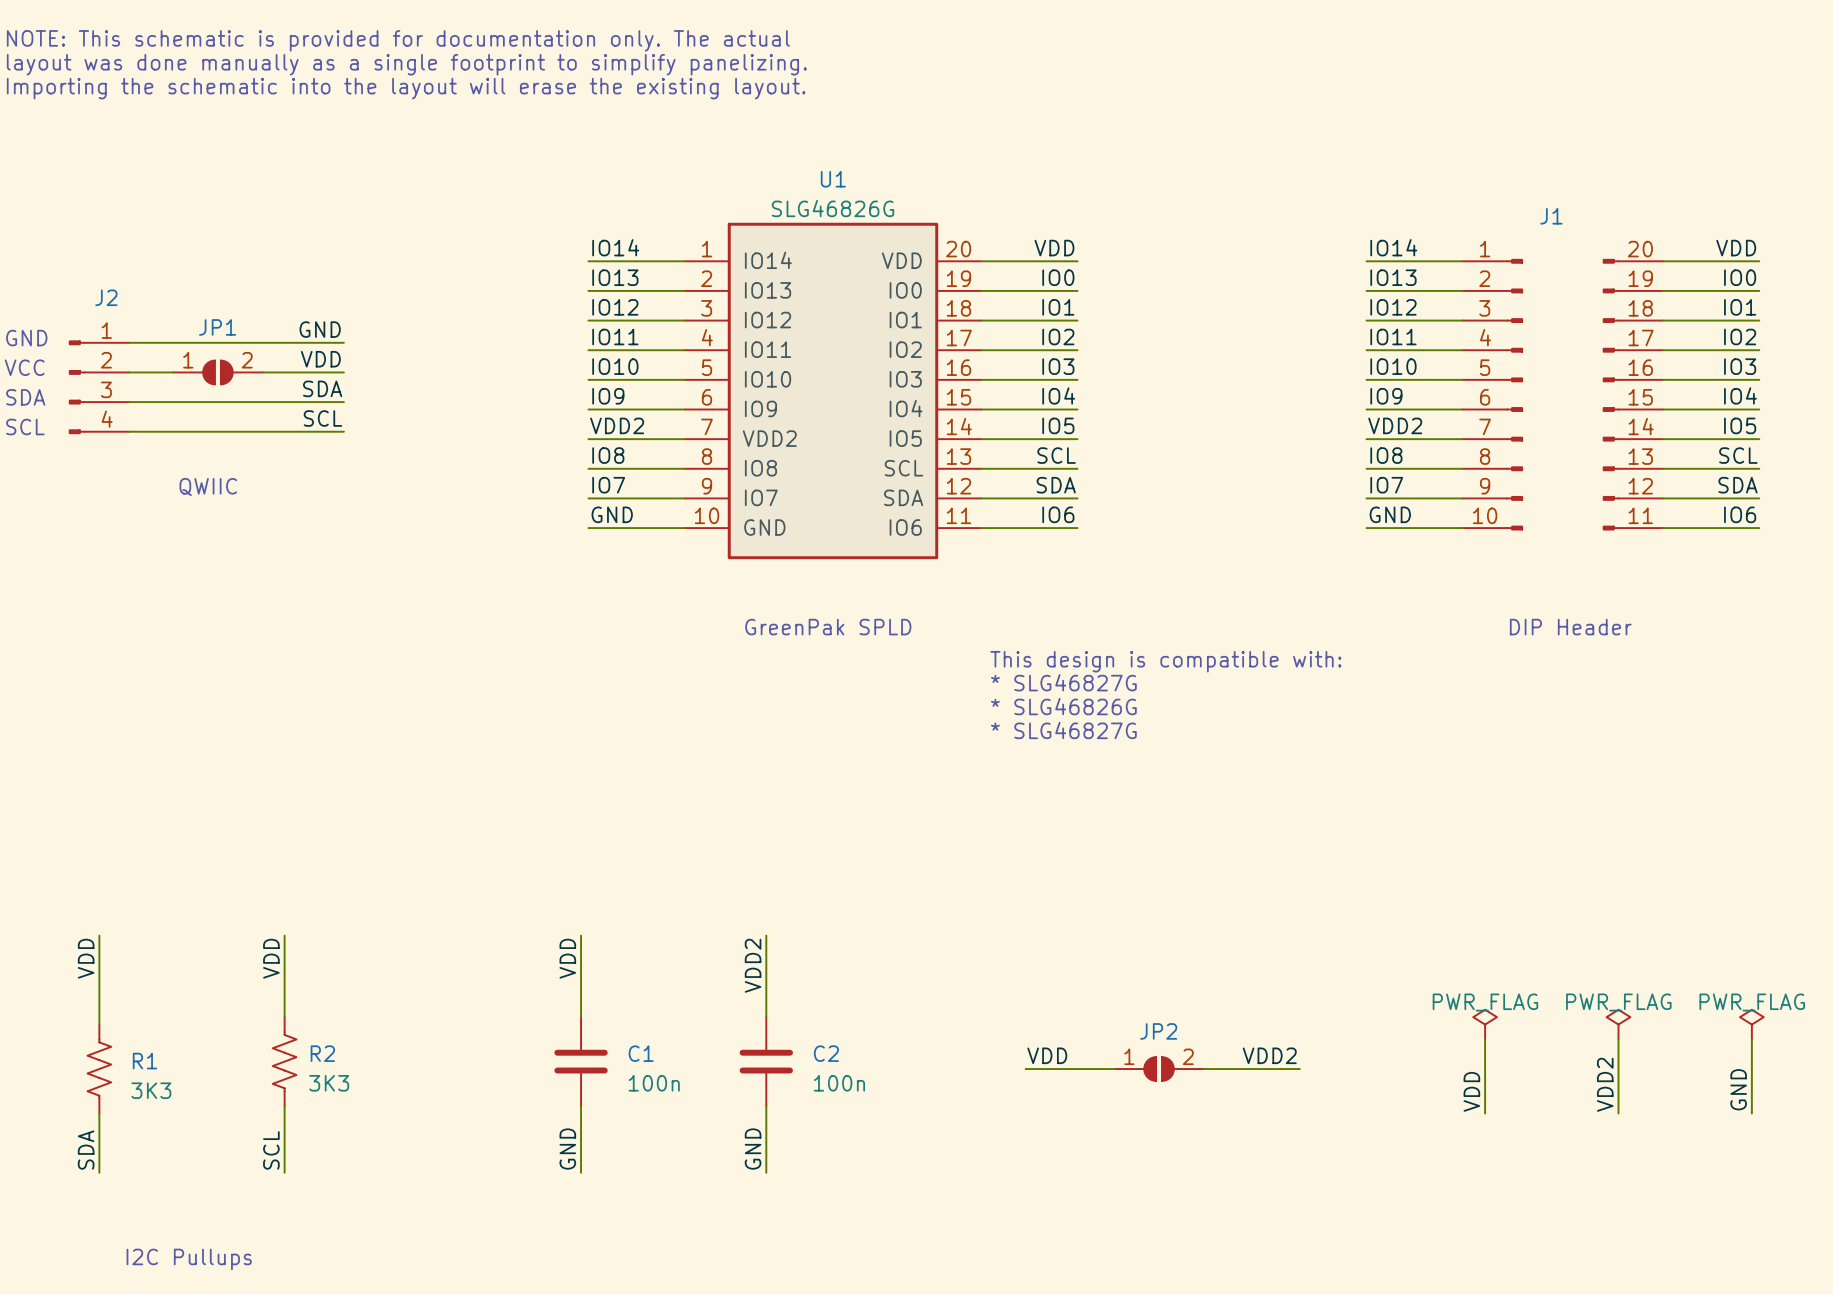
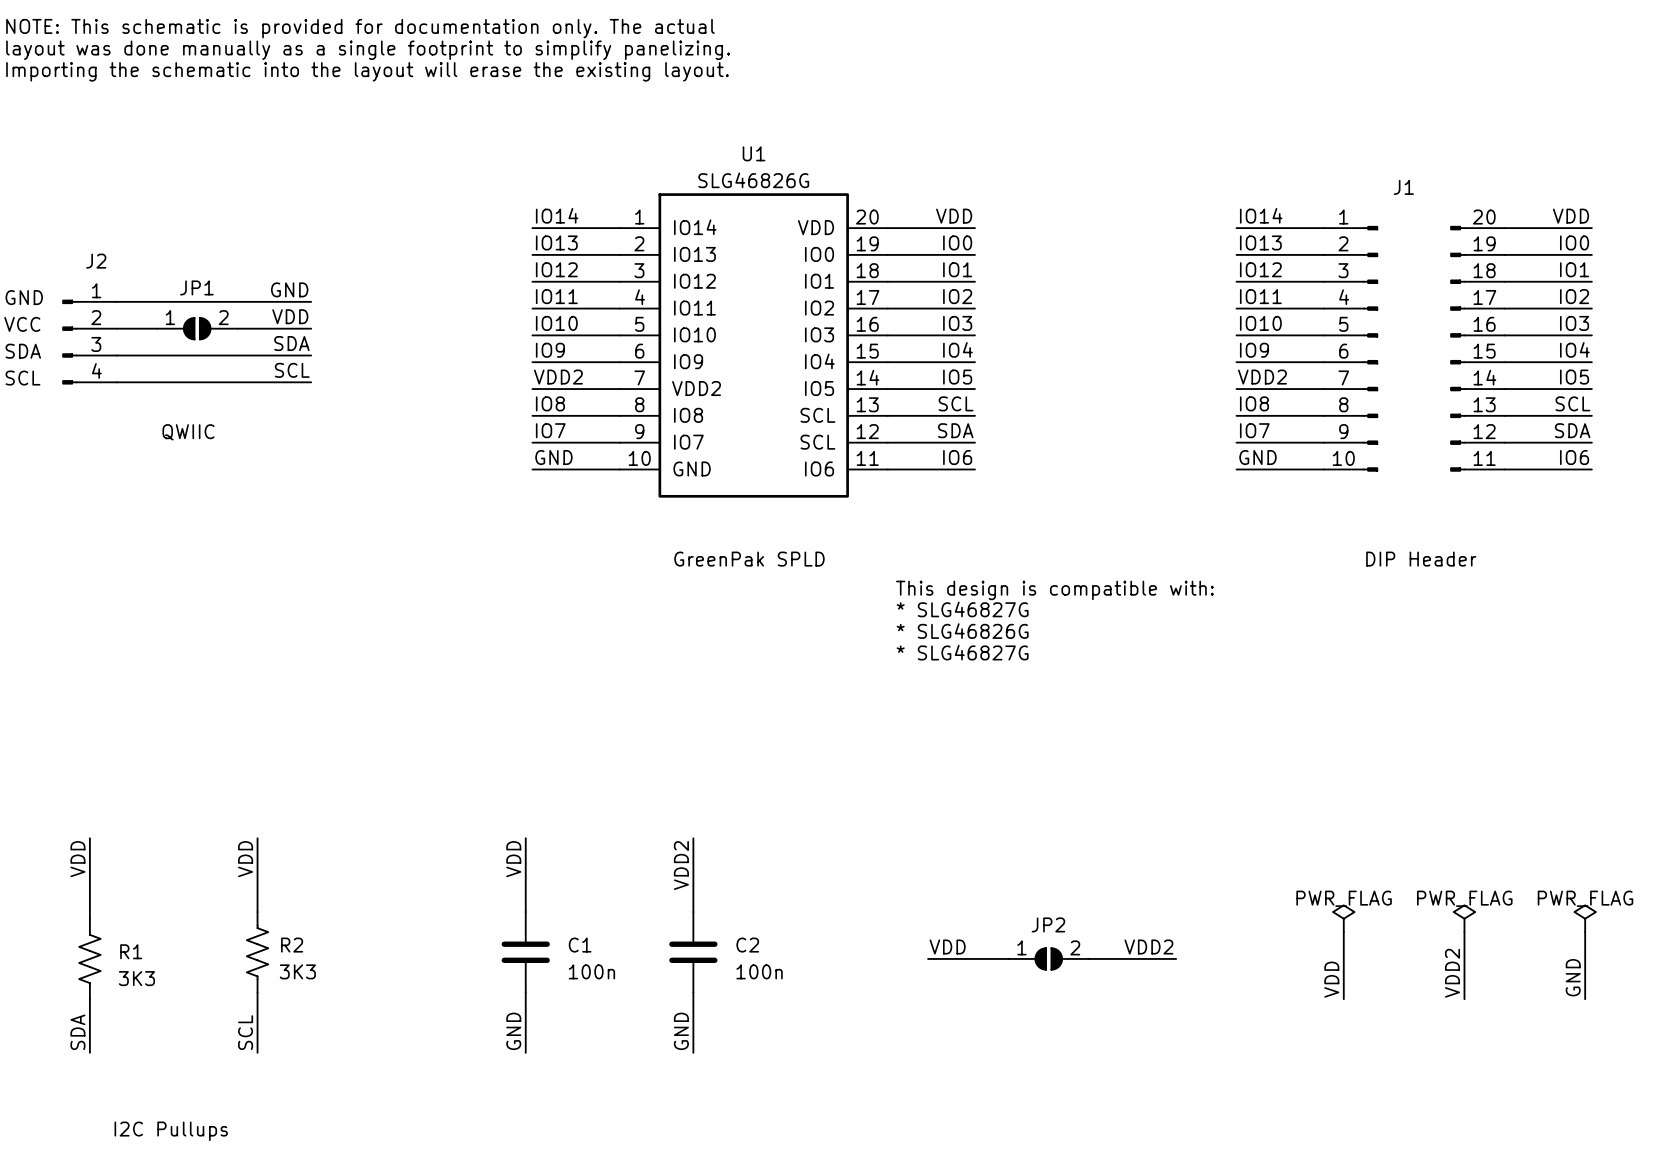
U1 pin name: SDA (903, 497) -> SCL (817, 442)

